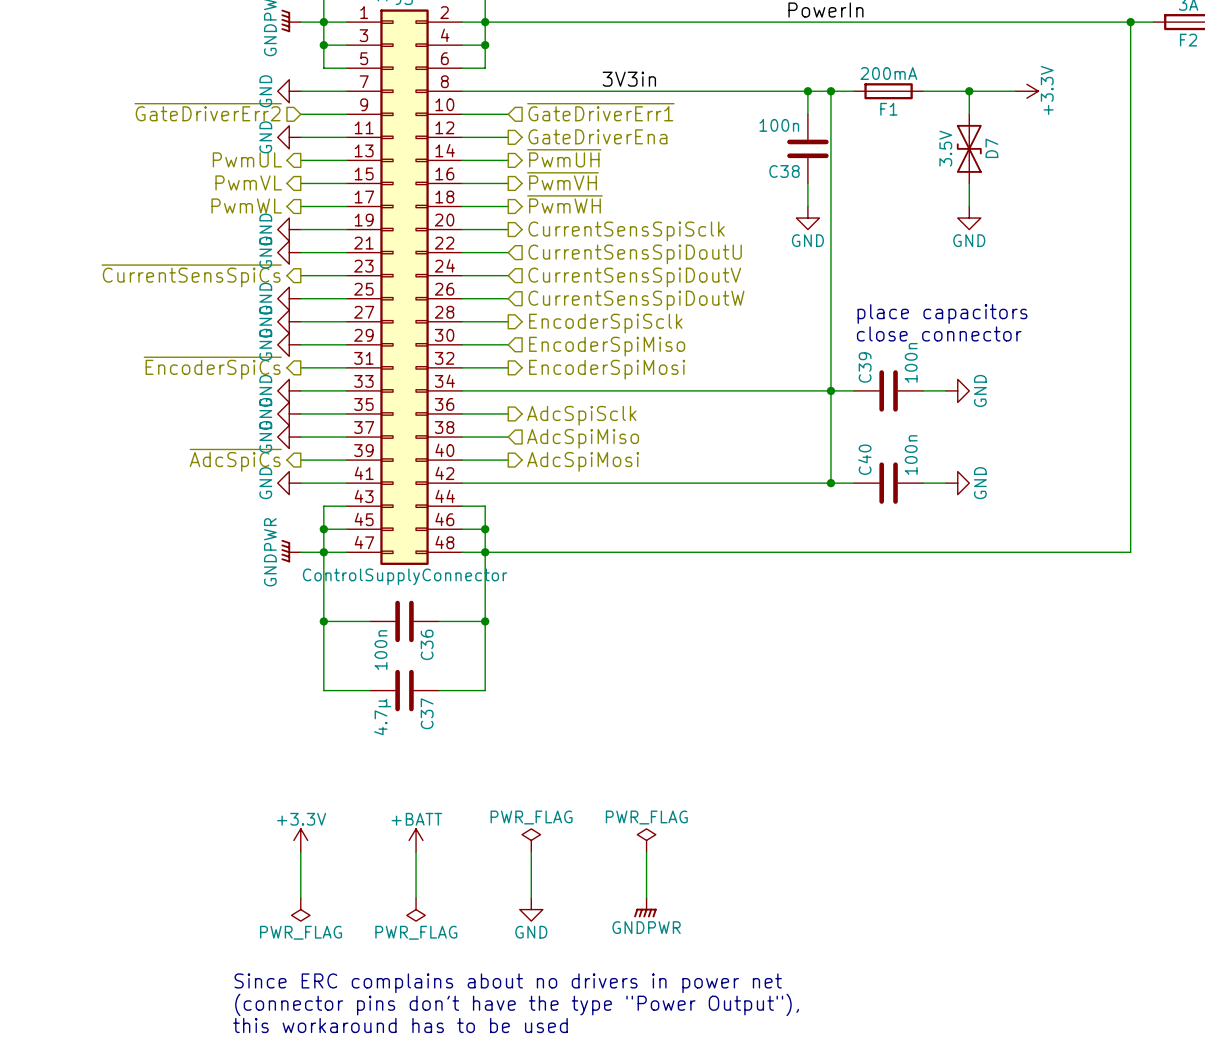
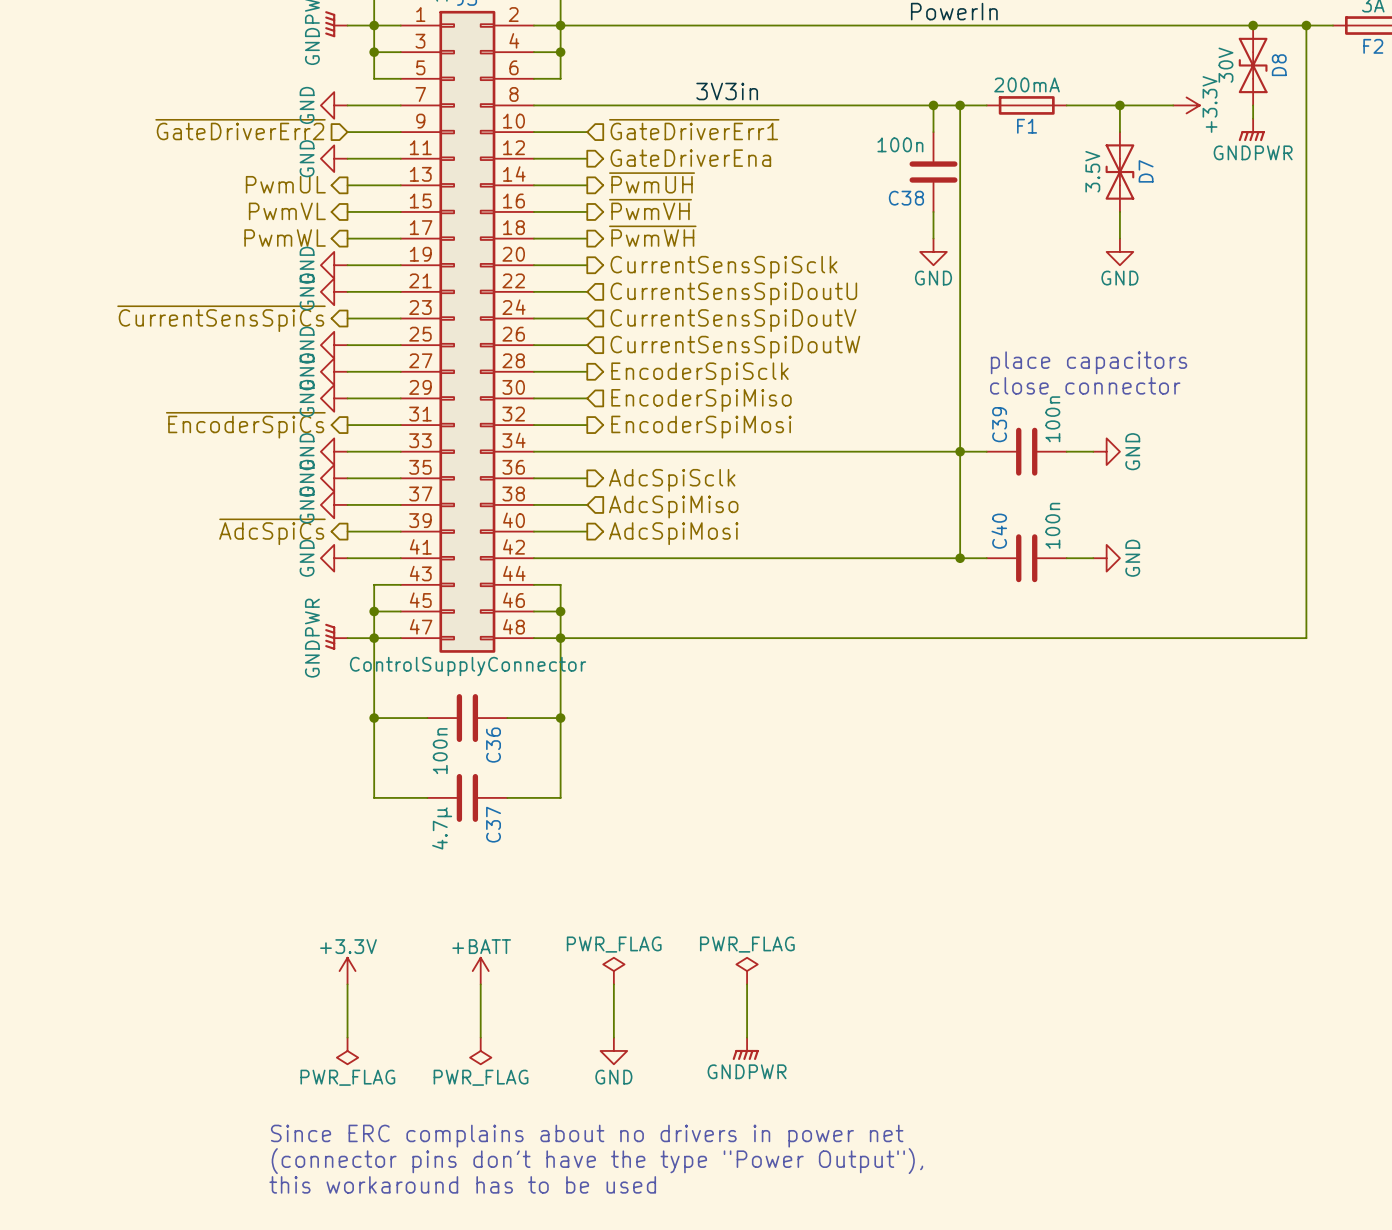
junction: none -> (1253, 25)
D8: none -> 30V (1253, 65)
wire: none -> (1253, 105) (1253, 118)
power symbol: none -> GNDPWR (1251, 129)

